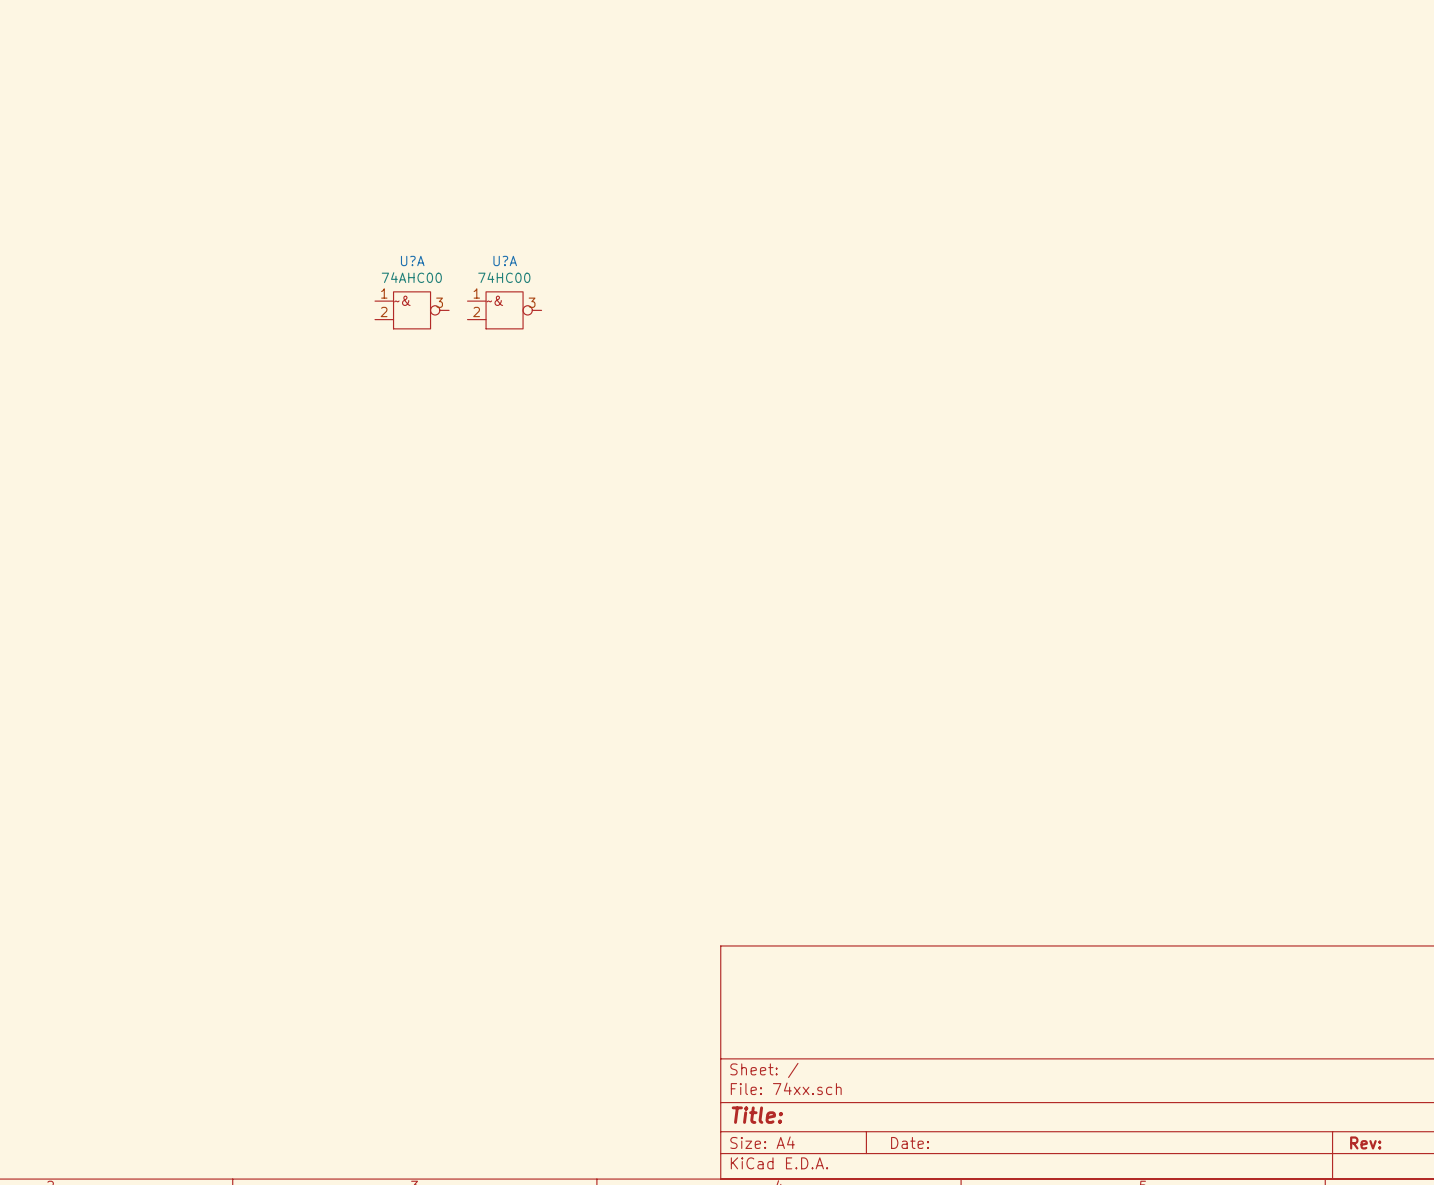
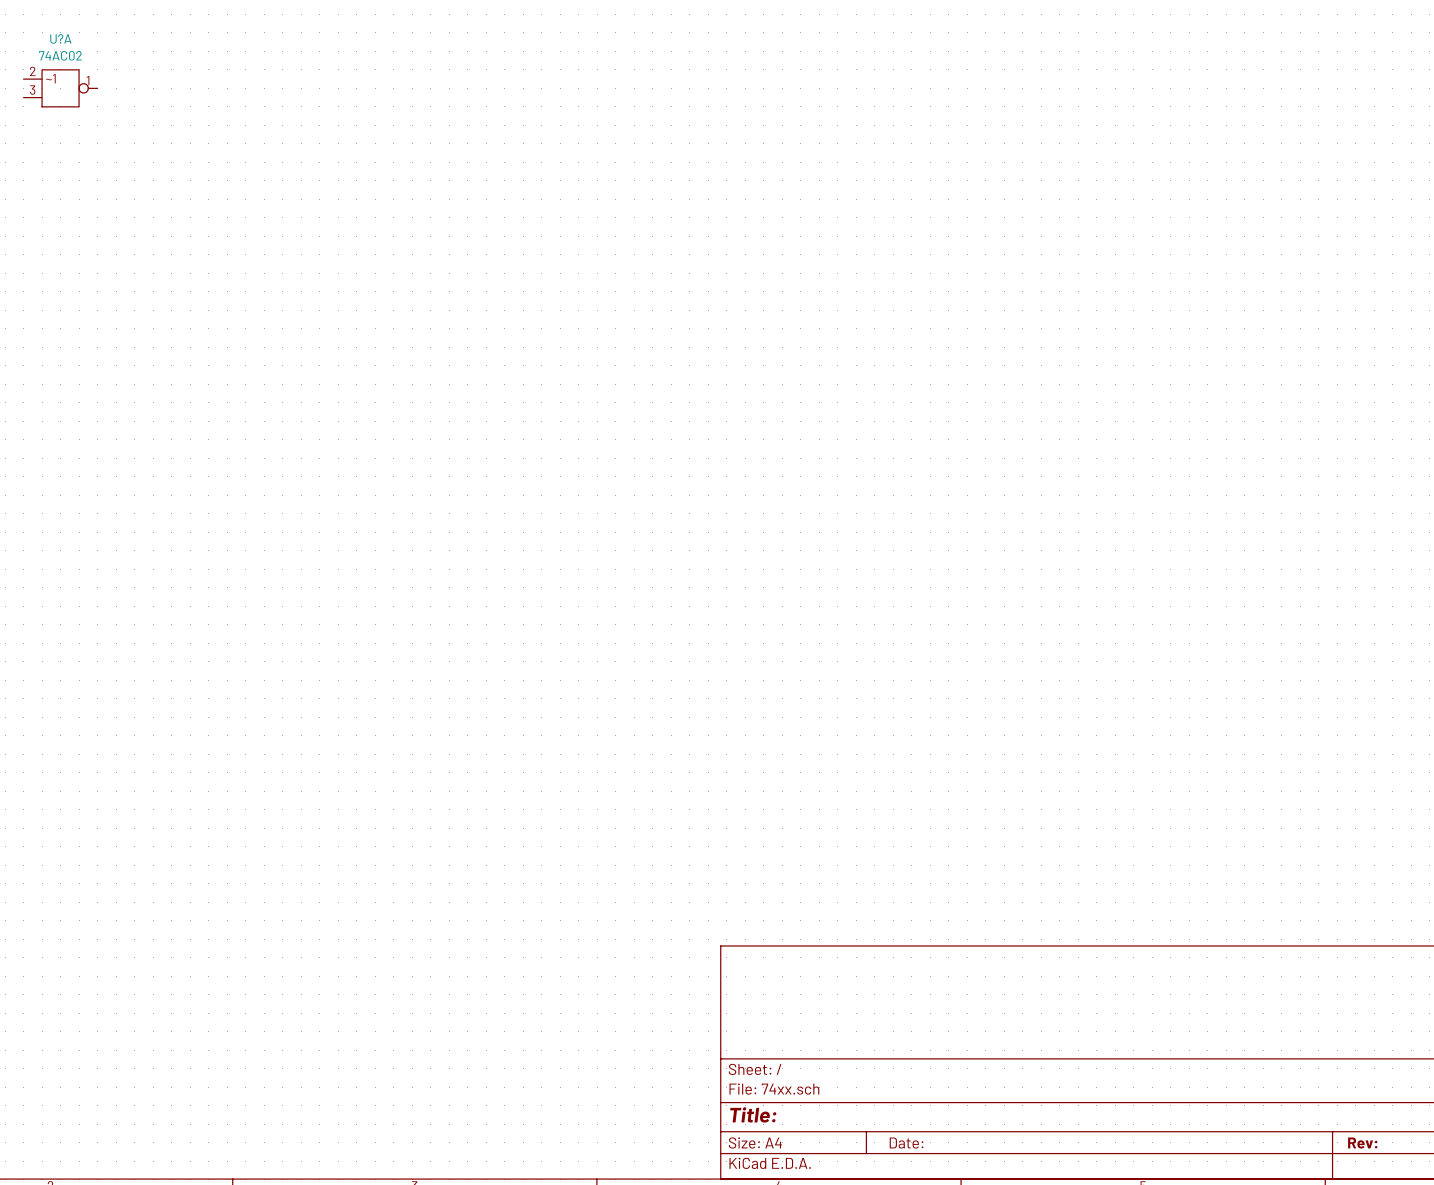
U?A: none -> 74AC02 (60, 88)
U?A: 74AHC00 (412, 310) -> none
U?A: 74HC00 (504, 310) -> none

